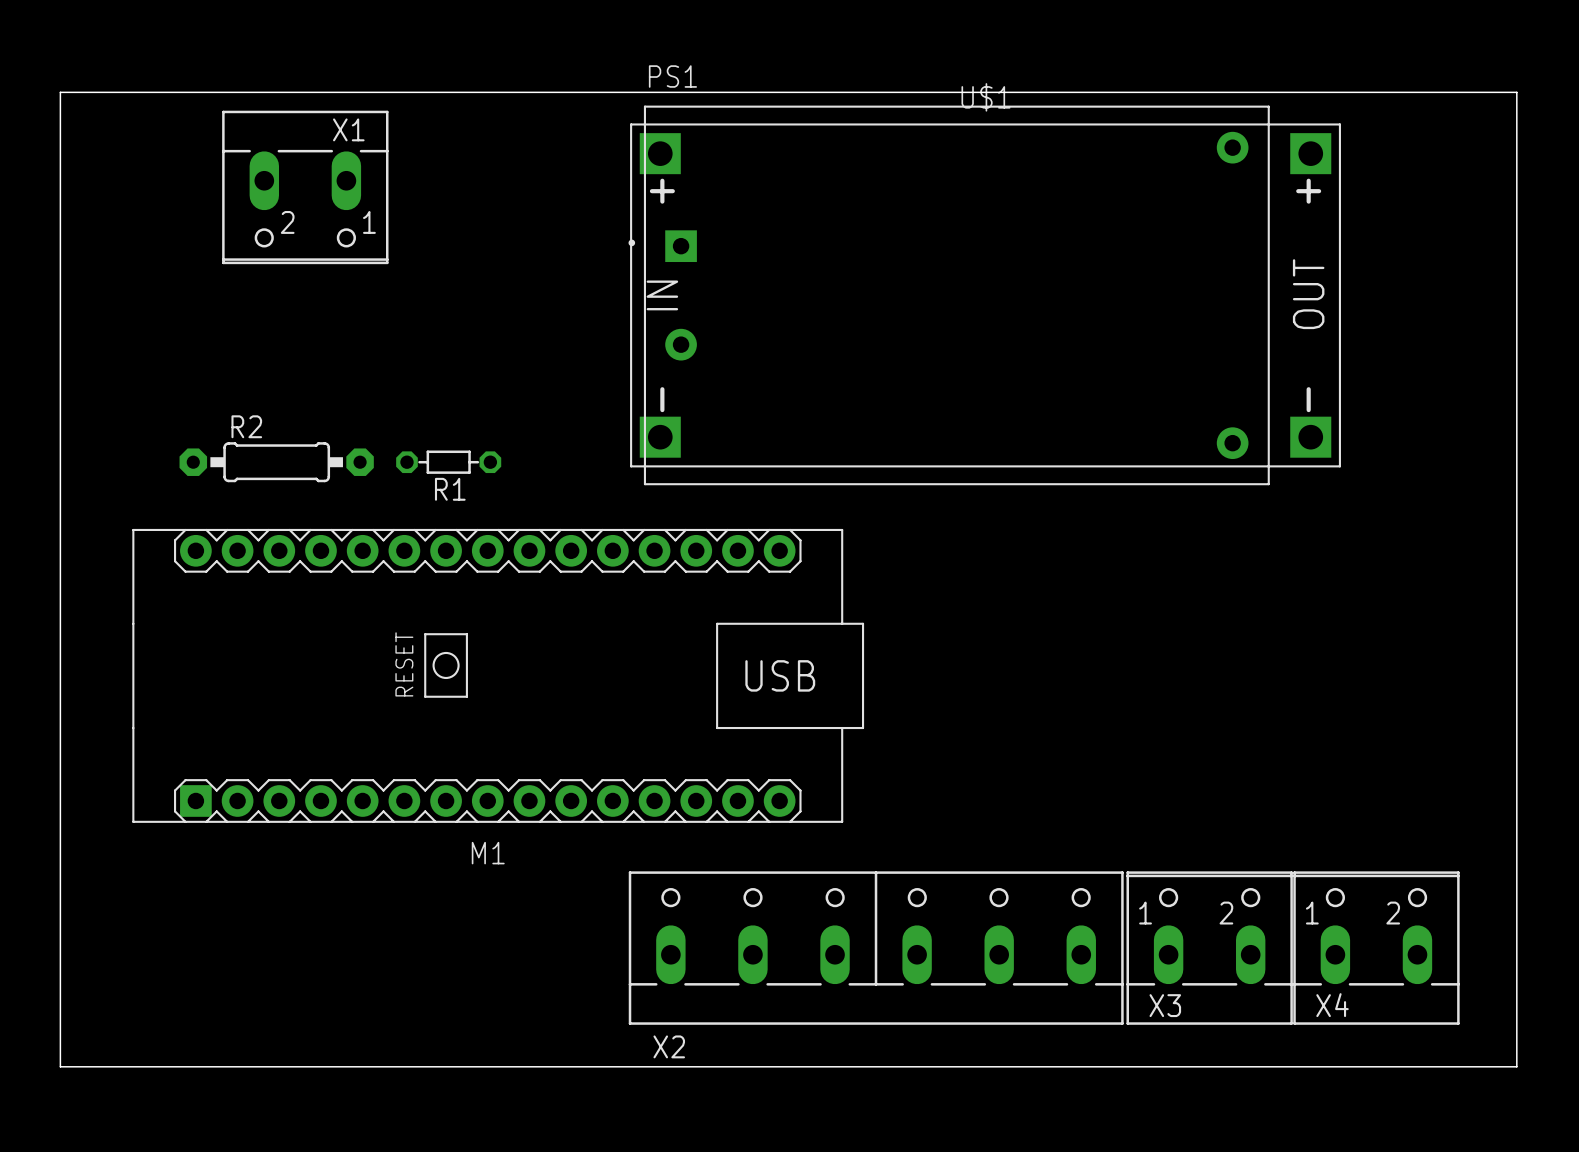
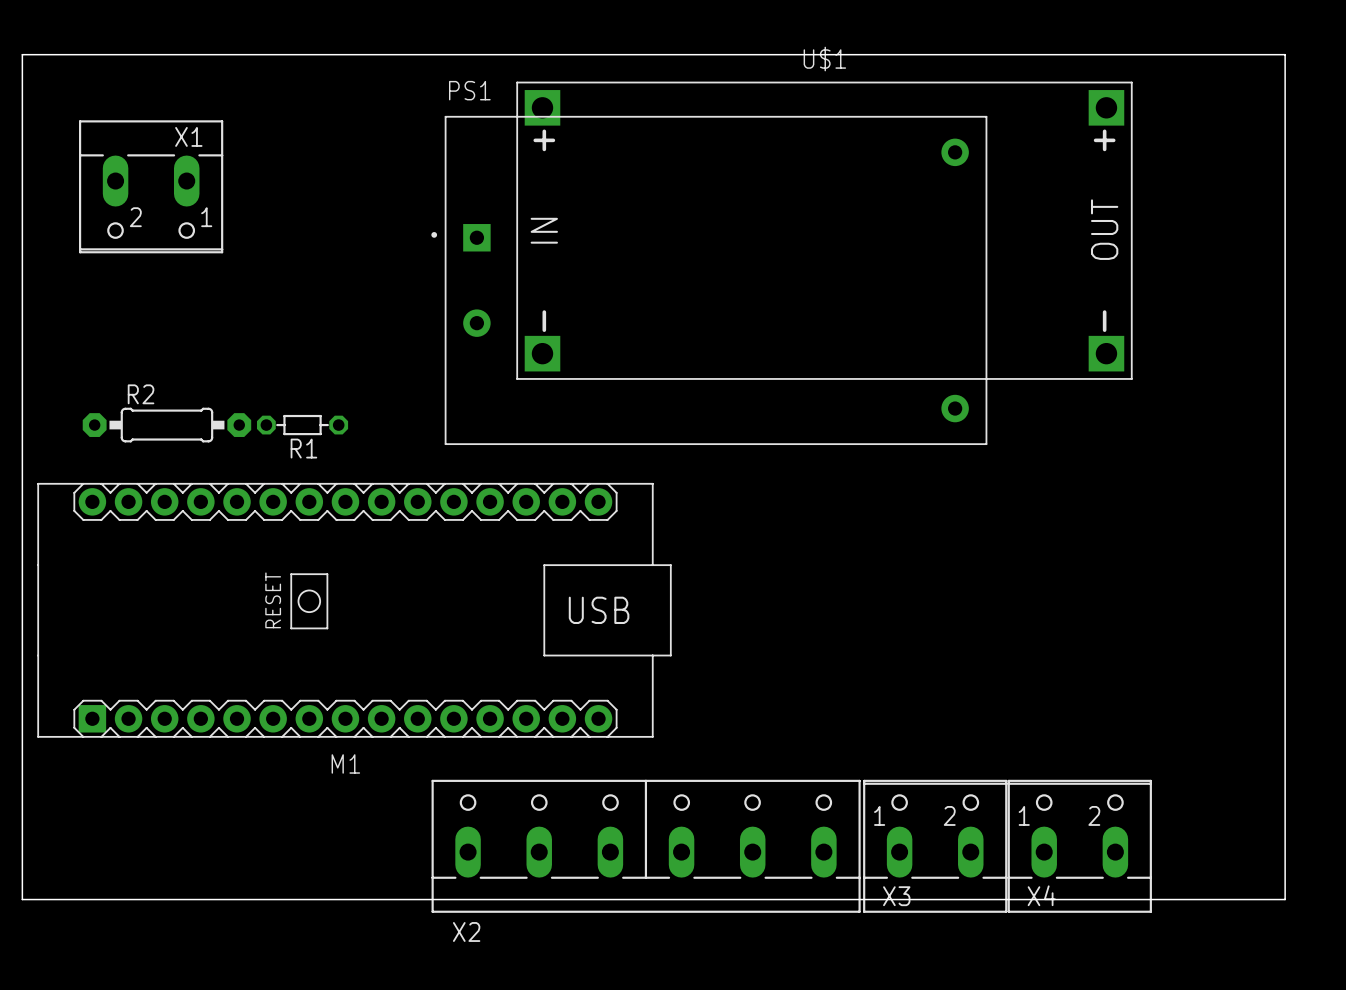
X1 footprint: [222, 110, 389, 265] -> [79, 120, 224, 254]
PS1 position: (949, 295) -> (709, 280)
R2 position: (276, 462) -> (166, 425)
R1 position: (448, 462) -> (302, 425)
M1 position: (498, 675) -> (354, 610)
X2 position: (876, 948) -> (646, 846)
X3 position: (1209, 948) -> (935, 846)
X4 position: (1376, 948) -> (1079, 846)

